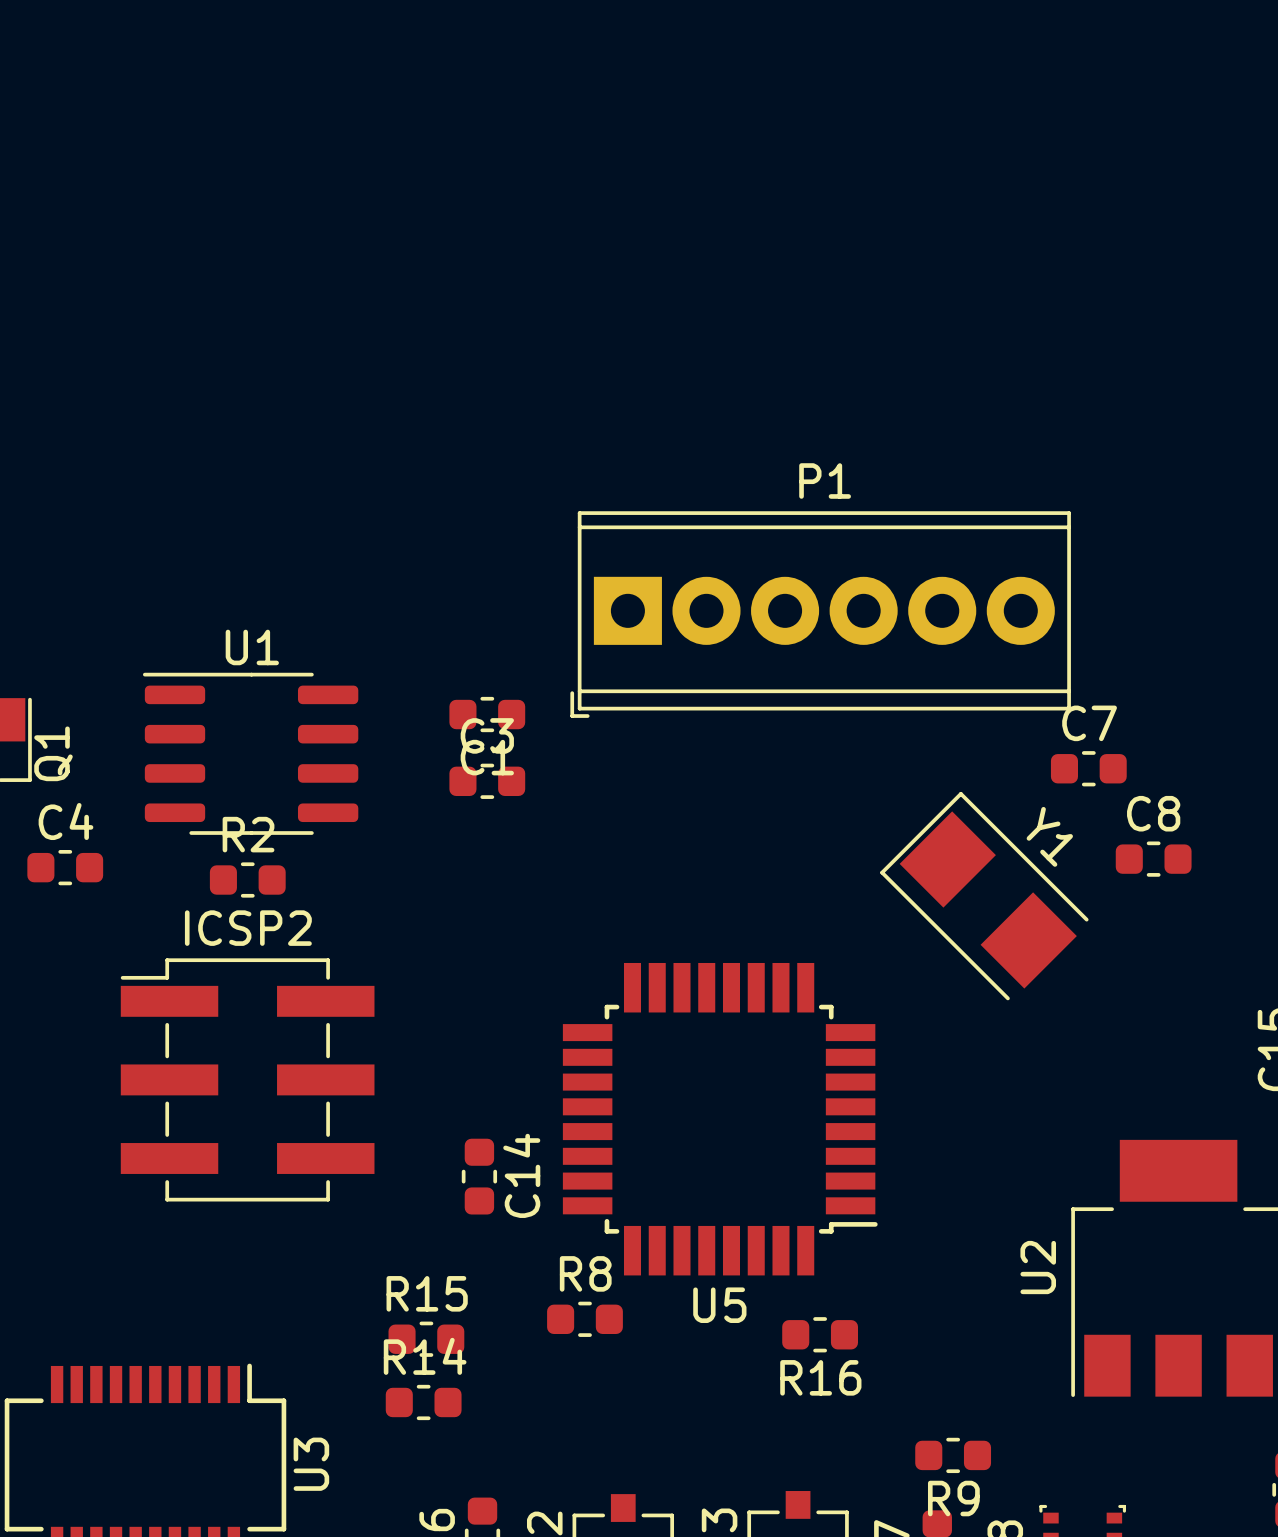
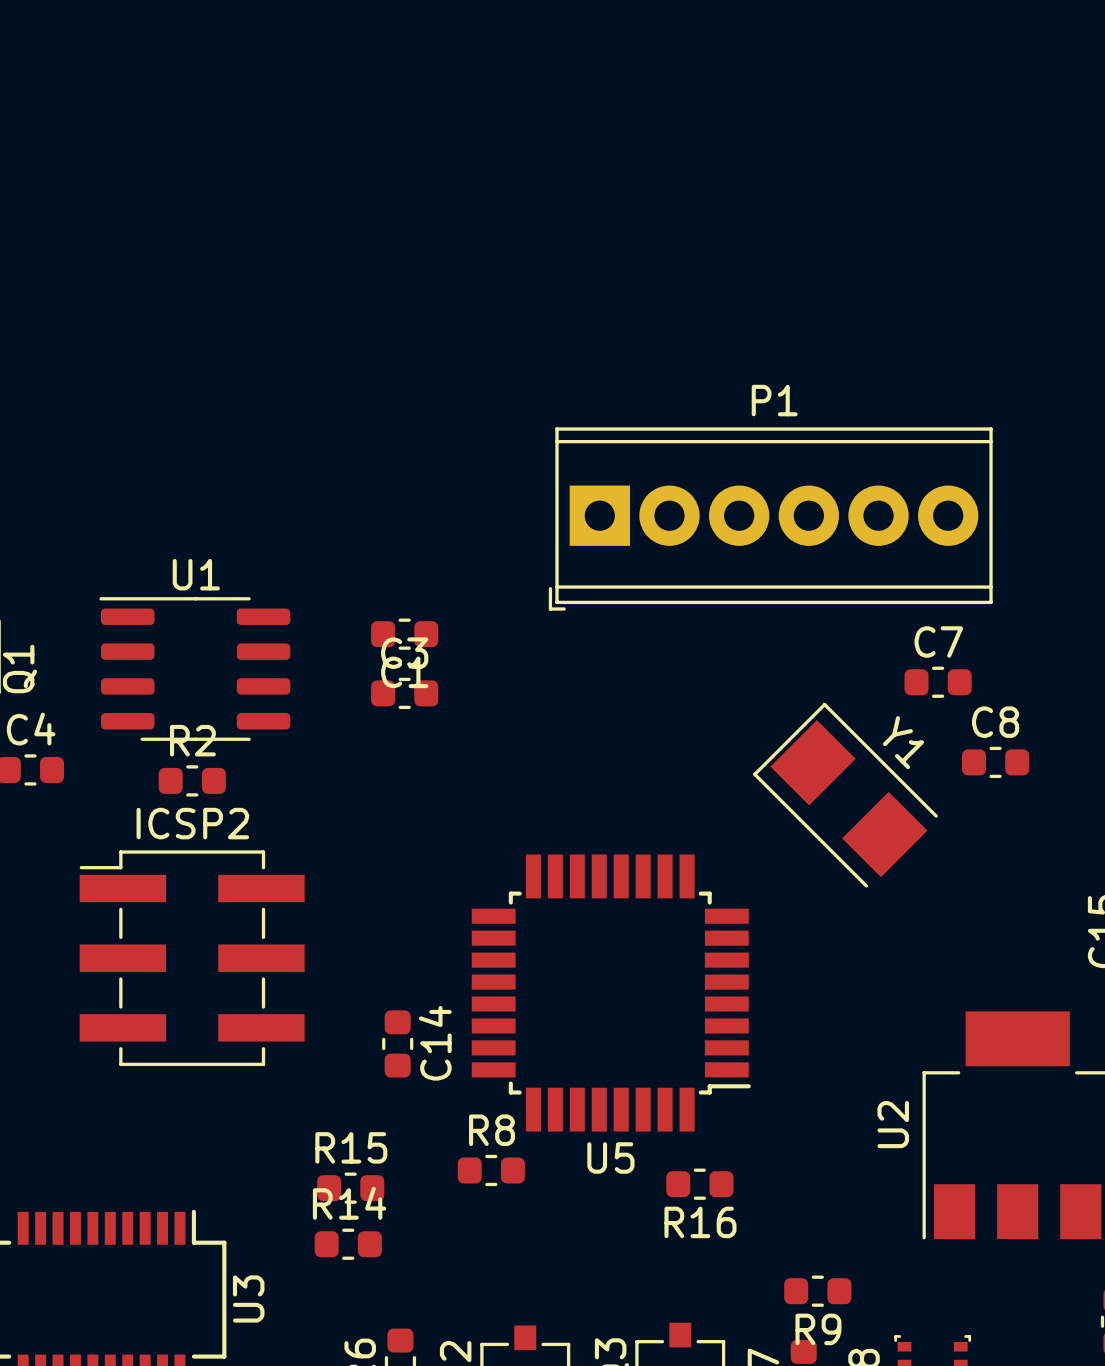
P1 position: (820, 614) -> (770, 519)

